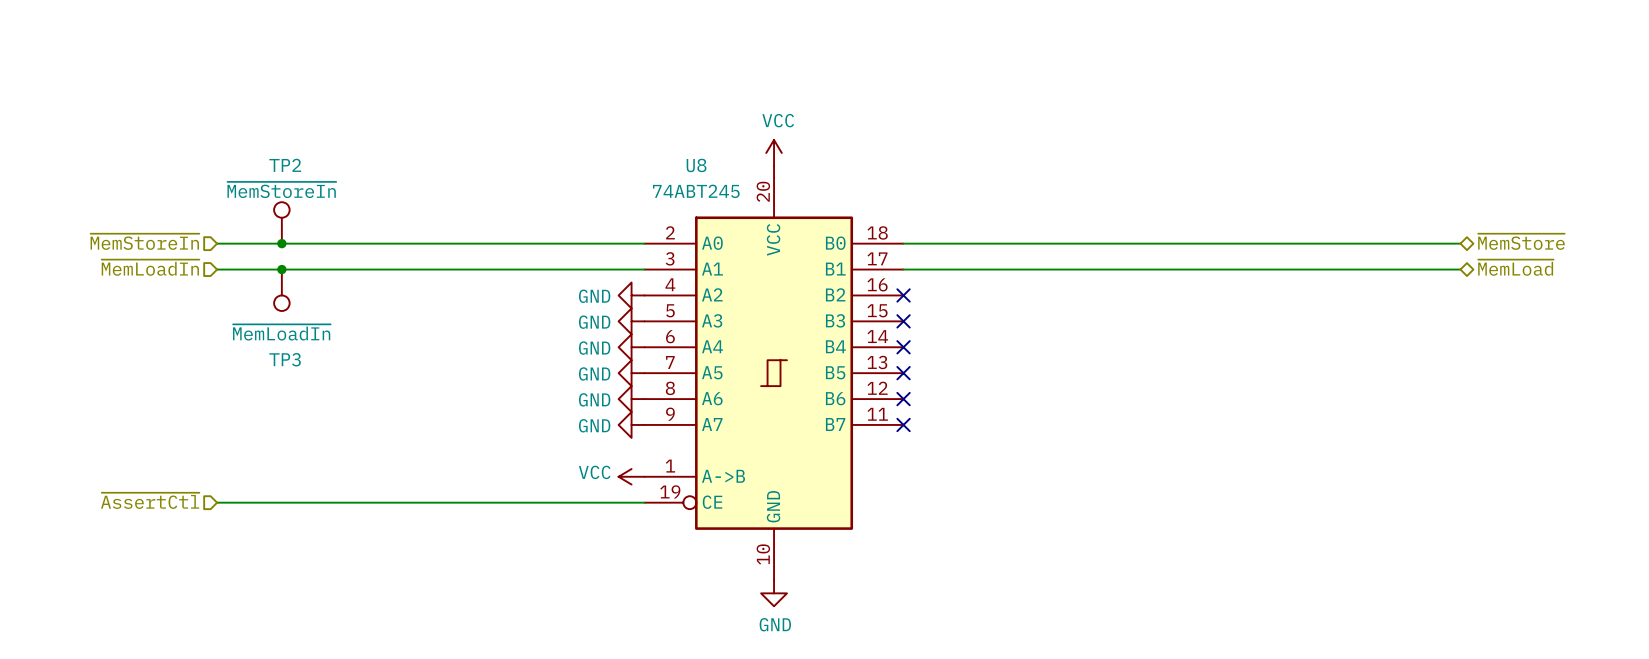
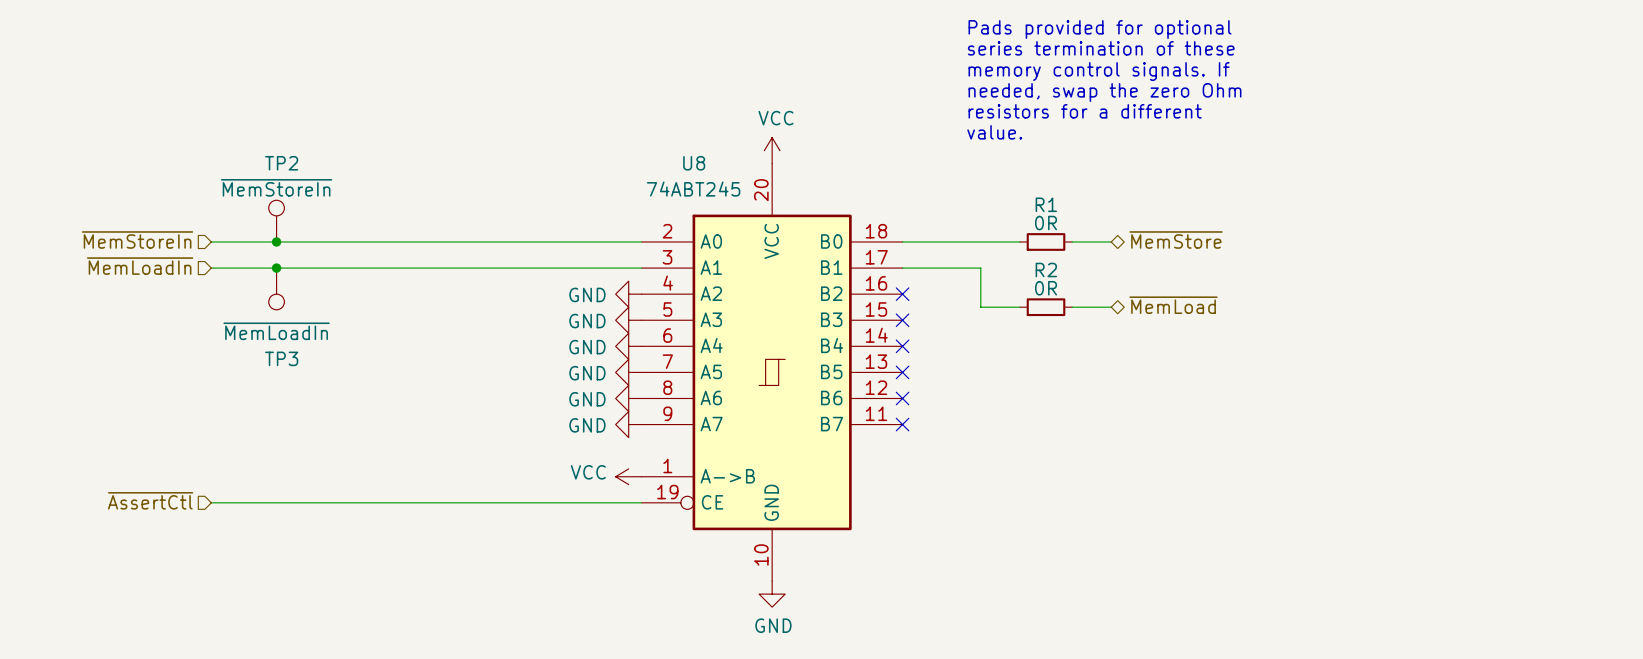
text: none -> Pads provided for optional (1100, 29)
text: none -> series termination of these (1101, 48)
text: none -> memory control signals. If (1099, 71)
text: none -> needed, swap the zero Ohm (1104, 92)
text: none -> resistors for a different (1085, 111)
text: none -> value. (994, 132)
hierarchical label: none -> ~{MemStore} (1176, 240)
hierarchical label: ~{MemStore} (1521, 241) -> none
wire: (1020, 243) (1071, 243) -> none
R1: none -> 0R (1046, 241)
wire: (1110, 243) (1460, 243) -> none
hierarchical label: ~{MemLoad} (1515, 267) -> none
wire: (981, 269) (1460, 269) -> (980, 268) (980, 307) (1019, 307)
hierarchical label: none -> ~{MemLoad} (1173, 305)
R2: none -> 0R (1046, 307)
wire: none -> (1072, 307) (1111, 307)

